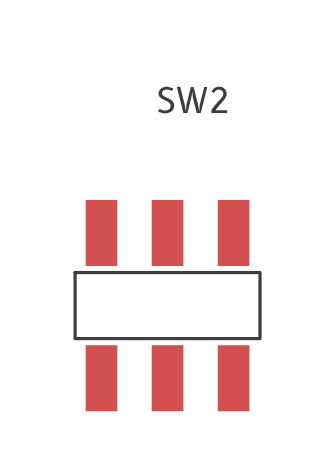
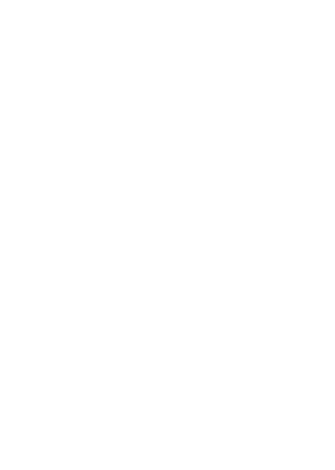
SW2: (167, 305) -> none

